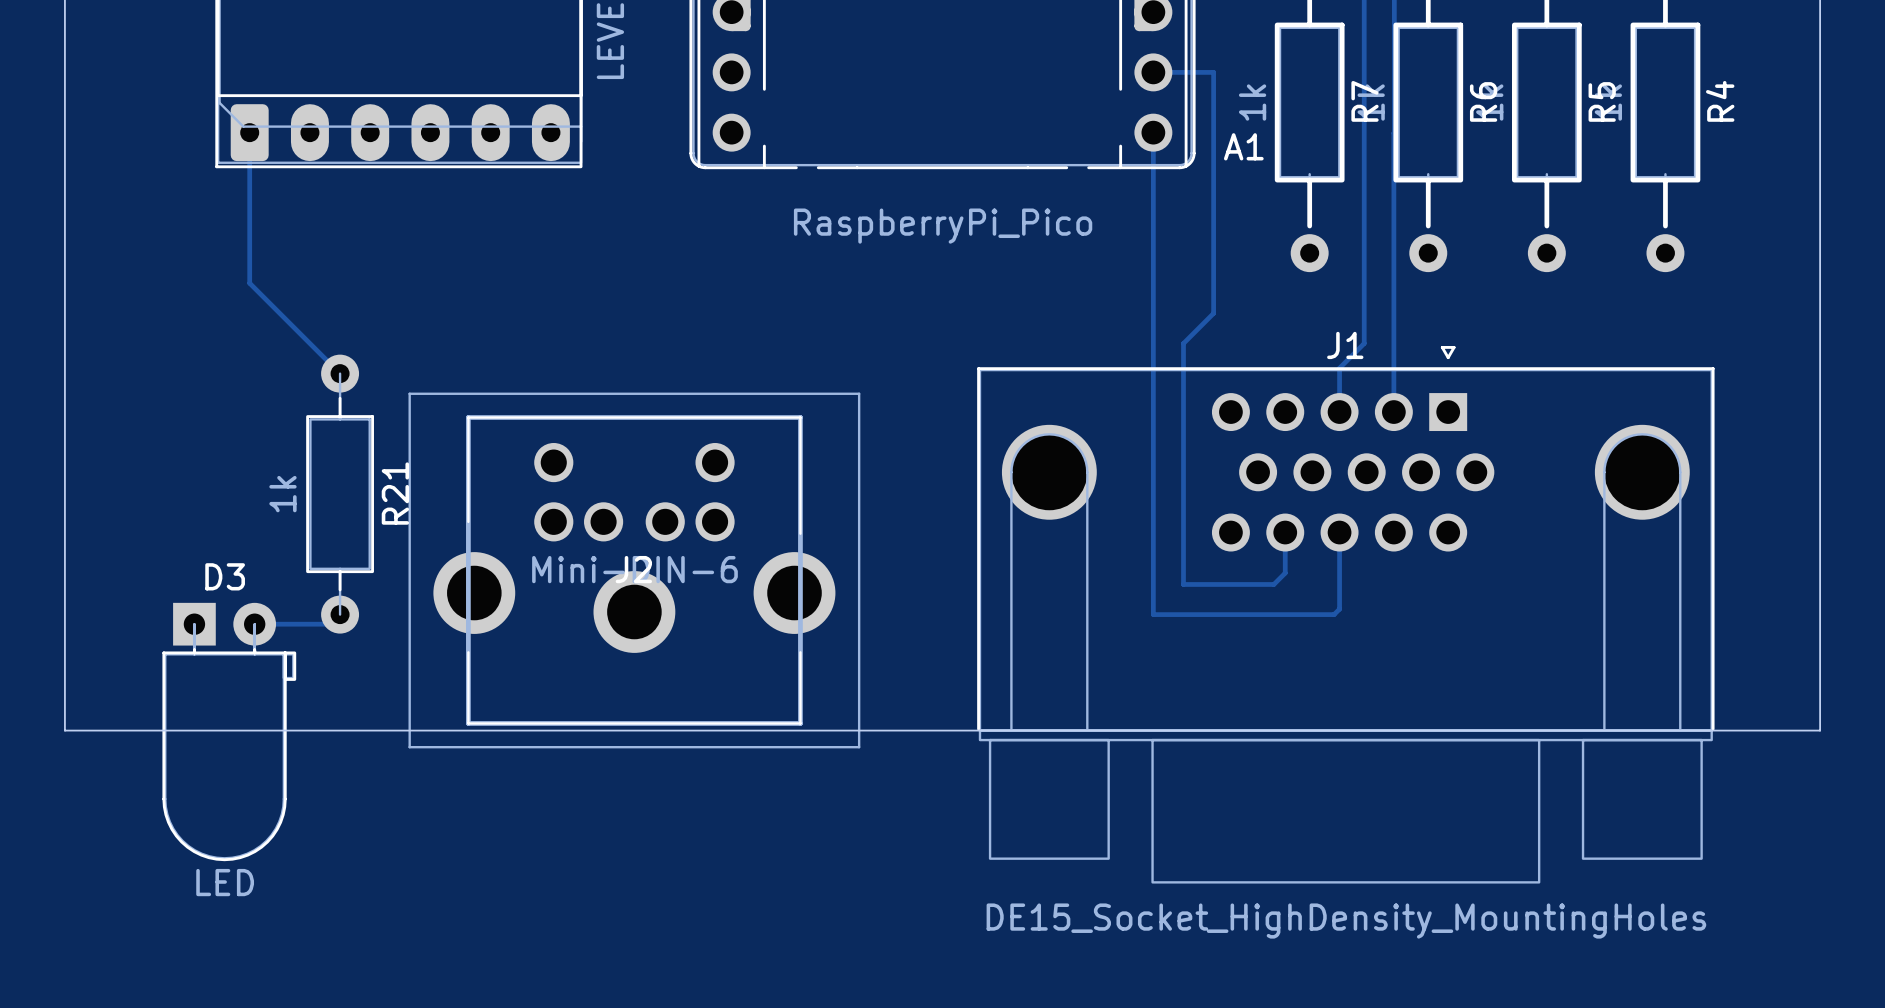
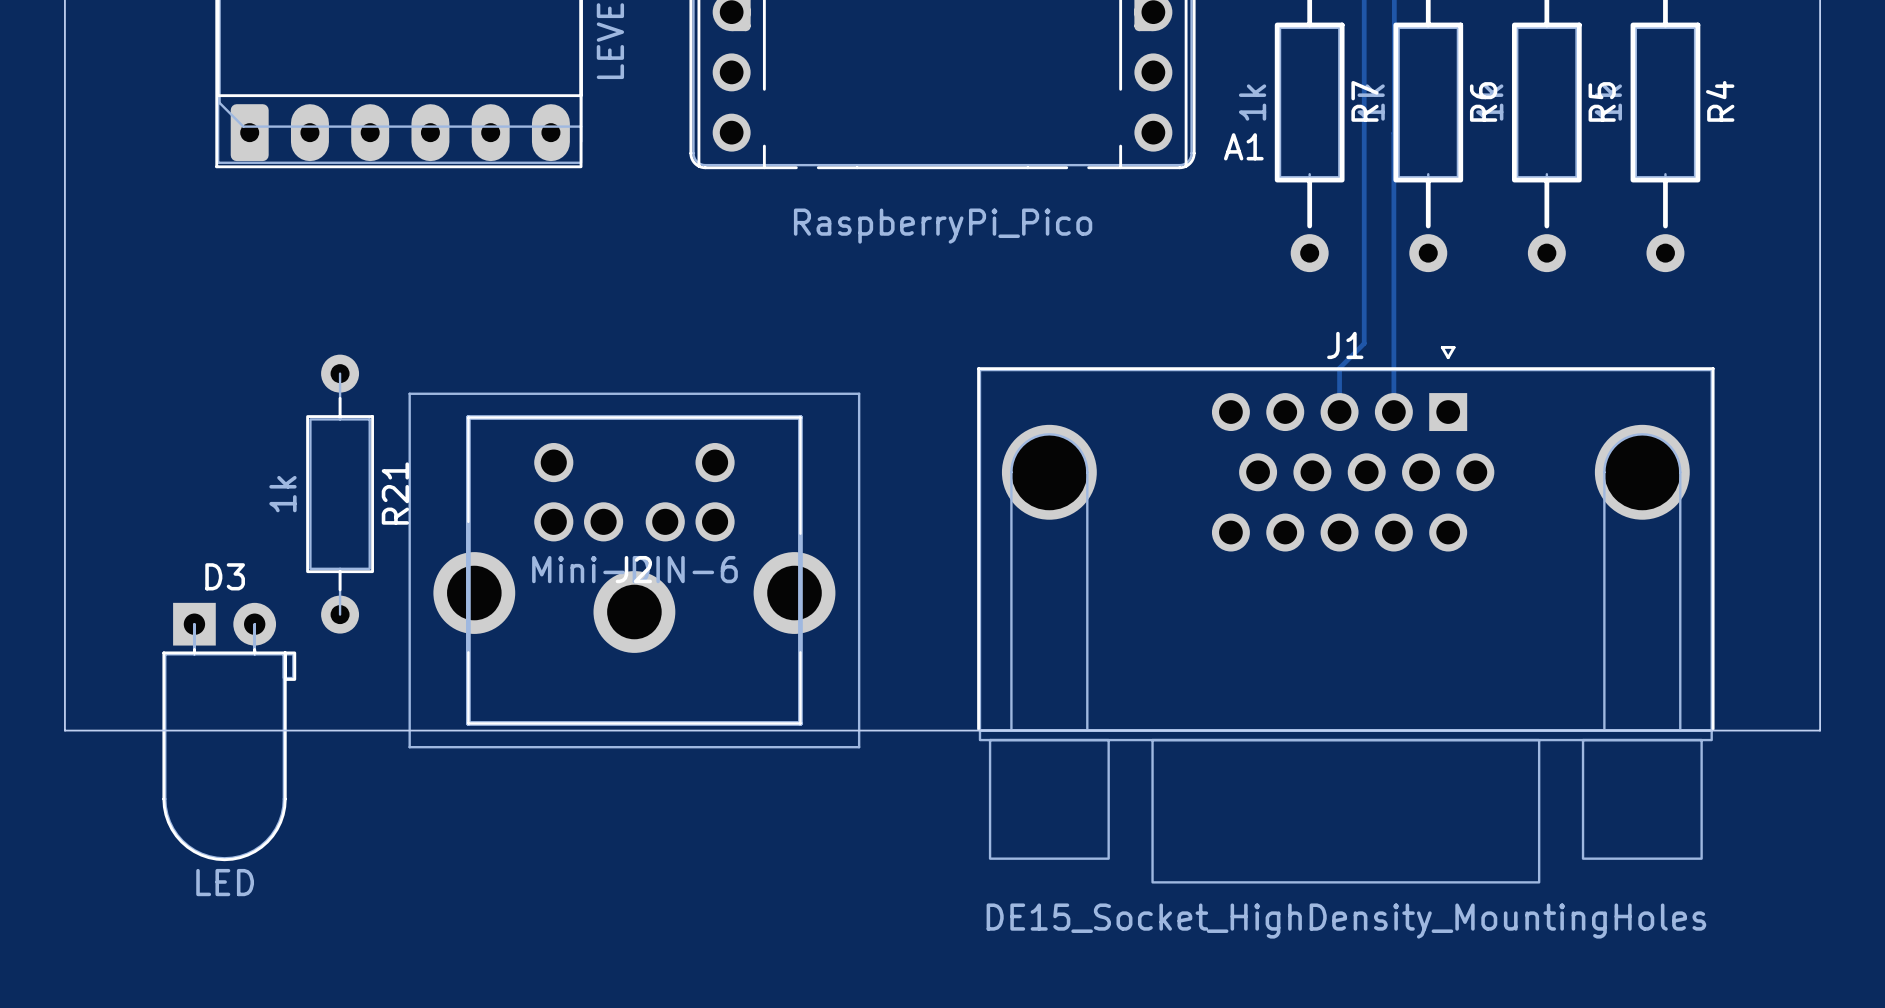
track: (1153, 72) (1213, 72) (1213, 313) (1183, 343) (1183, 584) (1273, 584) (1285, 573) (1285, 532) -> none
track: (249, 132) (249, 283) (340, 373) -> none
track: (1153, 132) (1153, 614) (1334, 614) (1339, 609) (1339, 532) -> none
track: (340, 614) (330, 624) (254, 624) -> none

